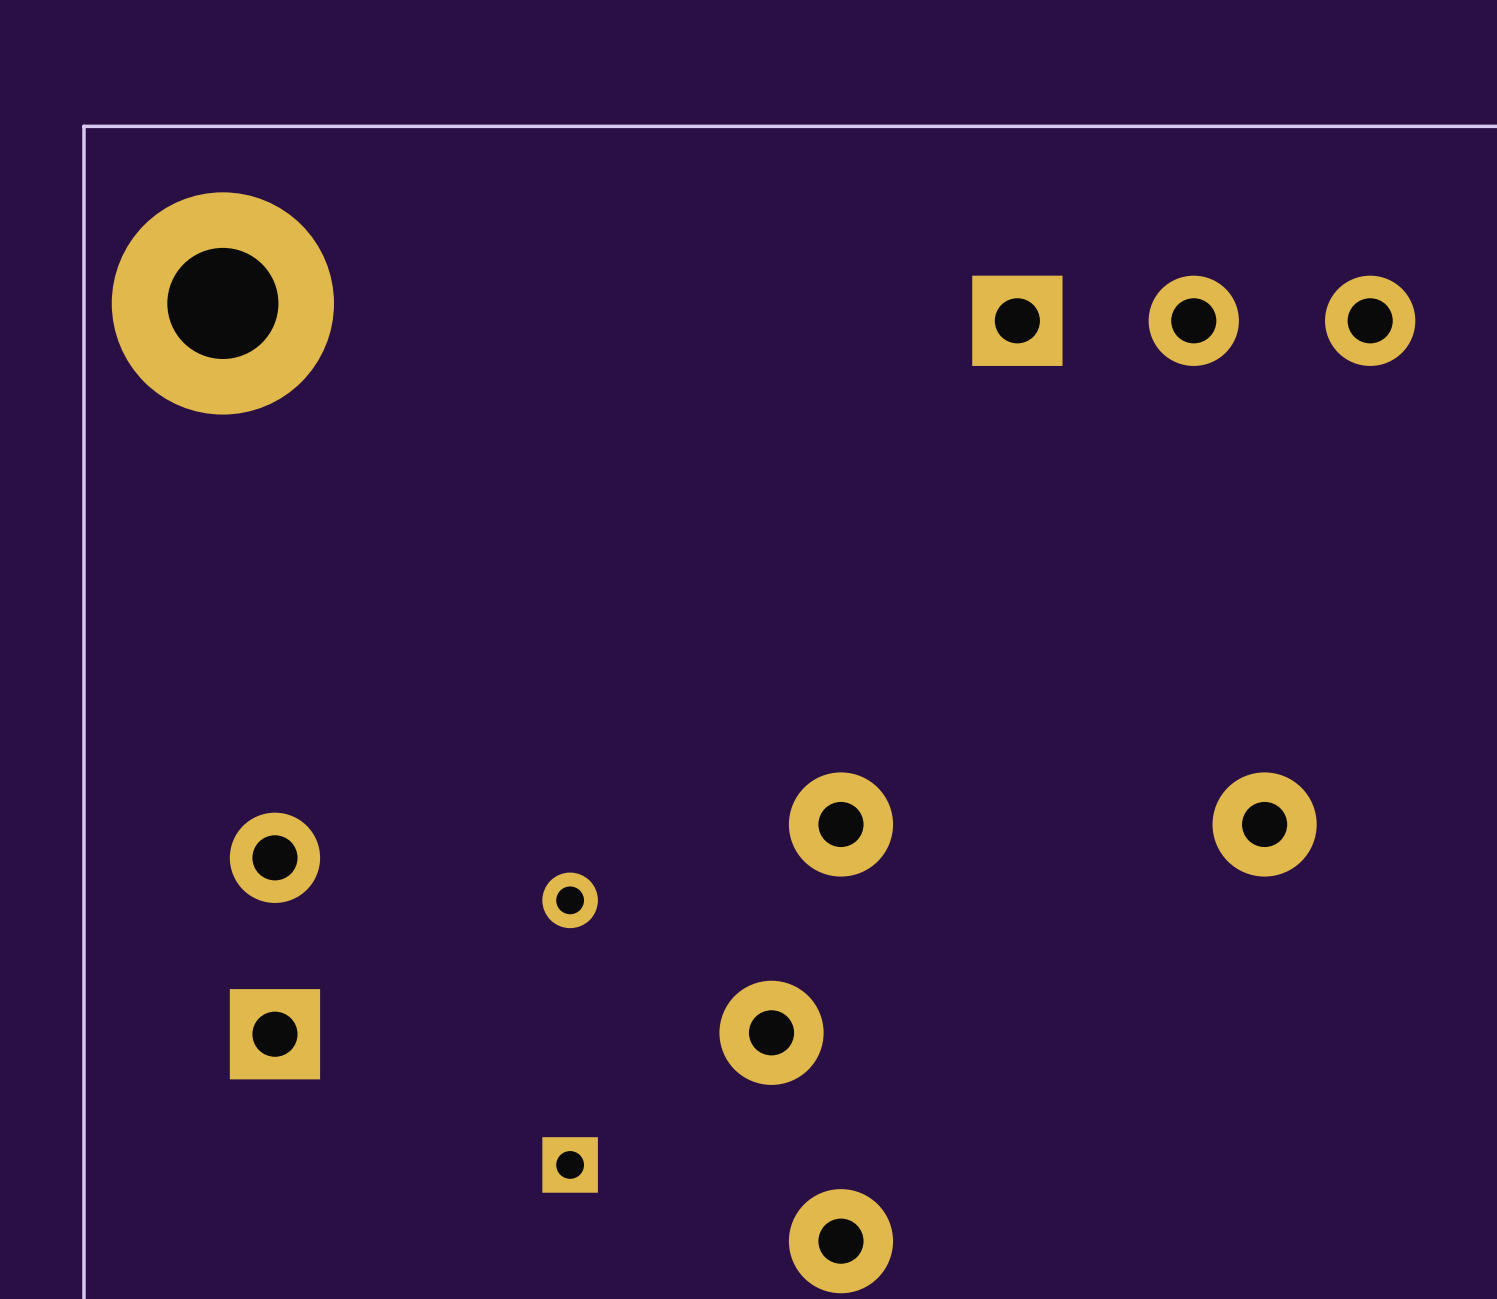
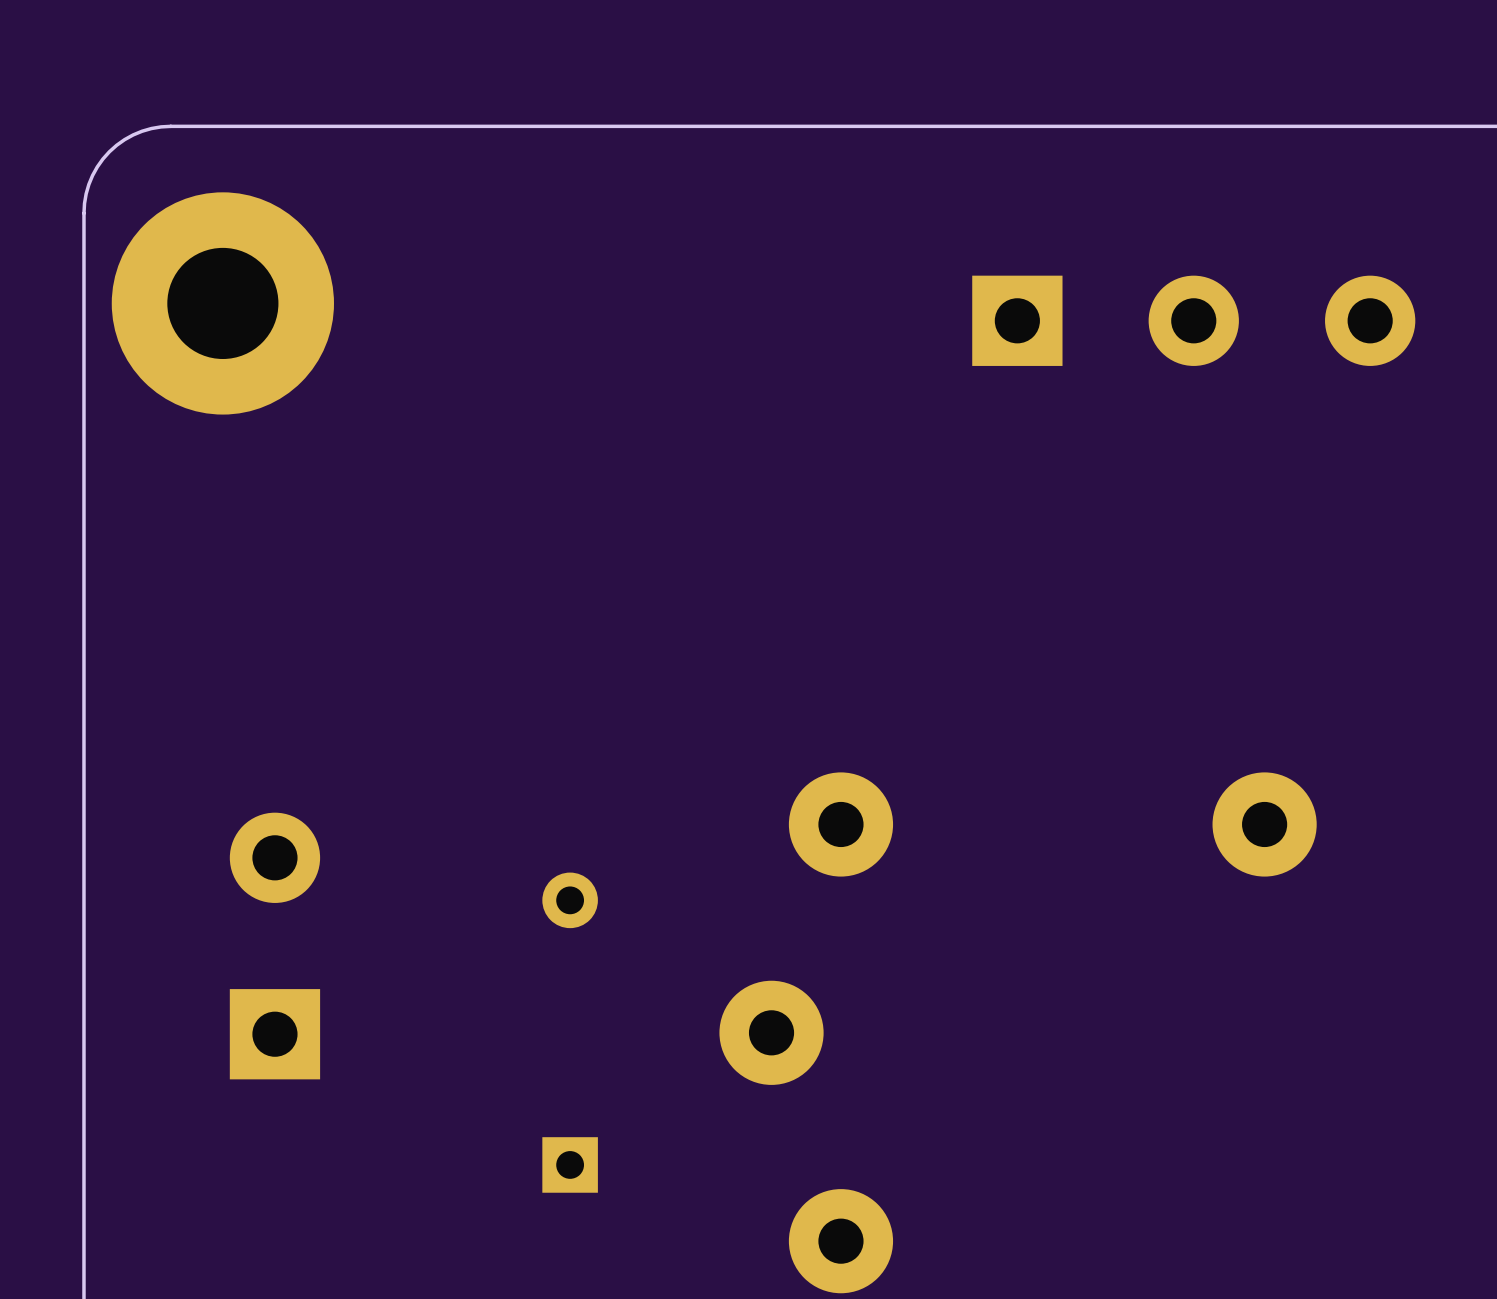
board edge: (170, 126) (83, 126) (83, 213) -> (170, 126) (142, 131) (124, 139) (109, 151) (92, 175) (86, 193) (83, 213)

